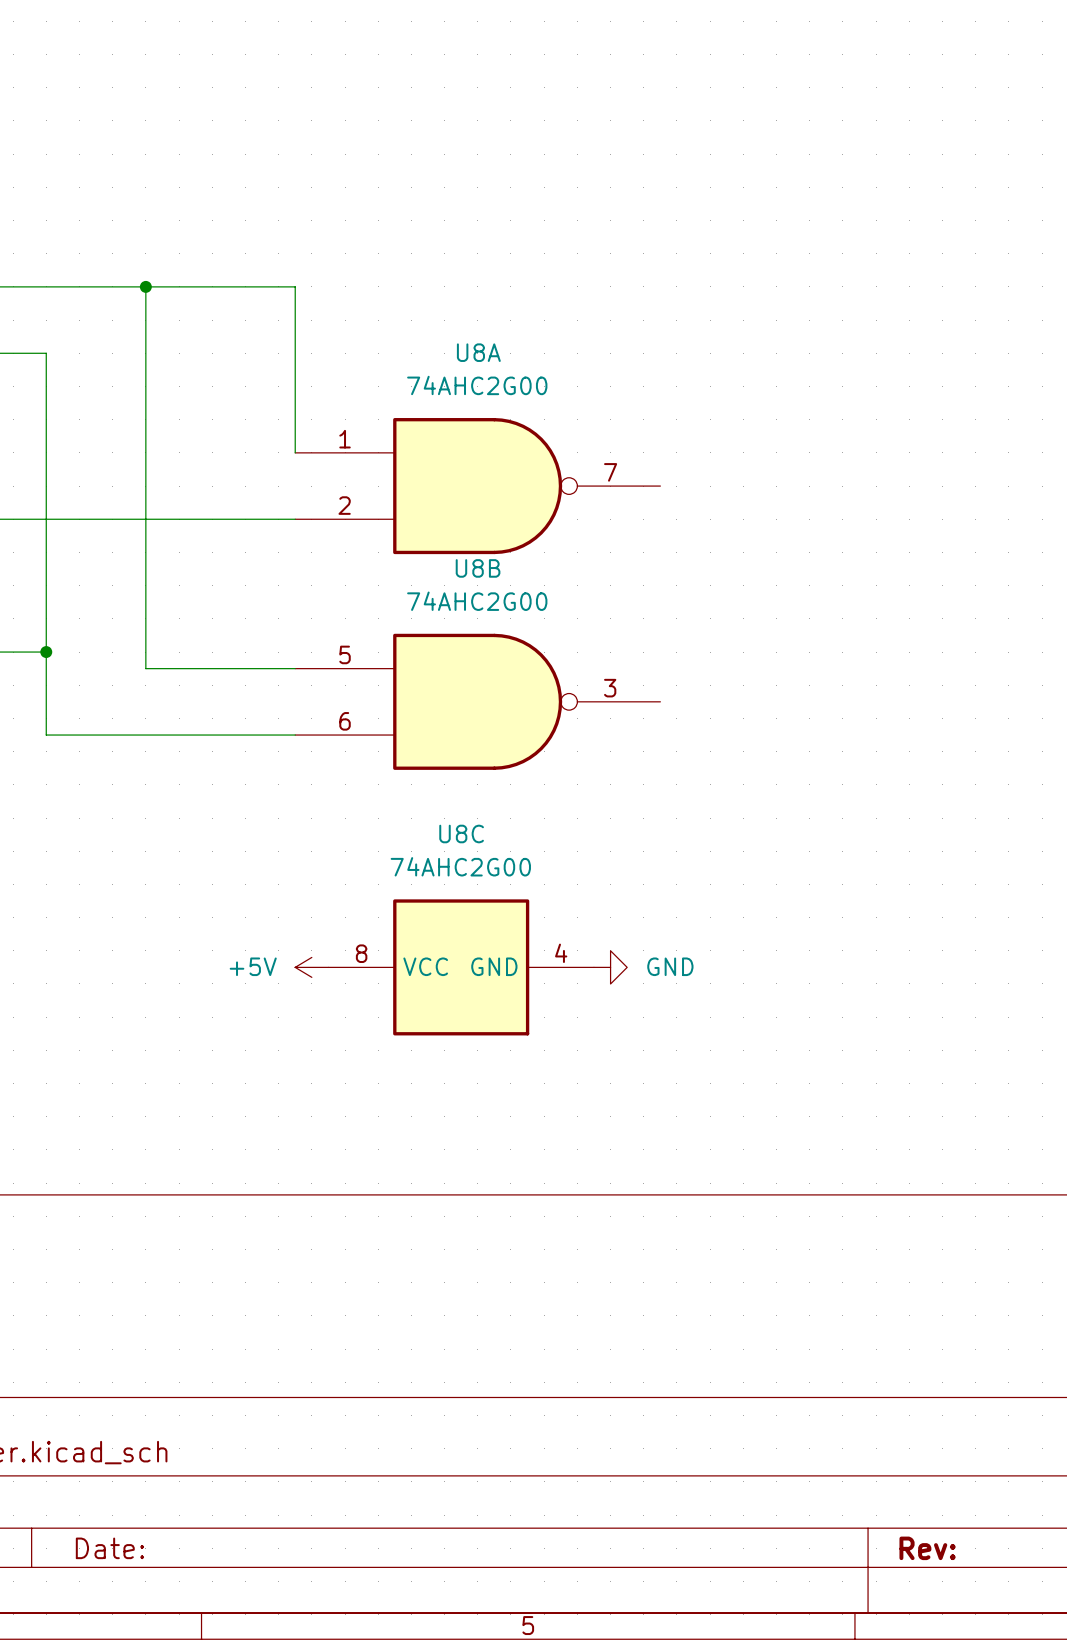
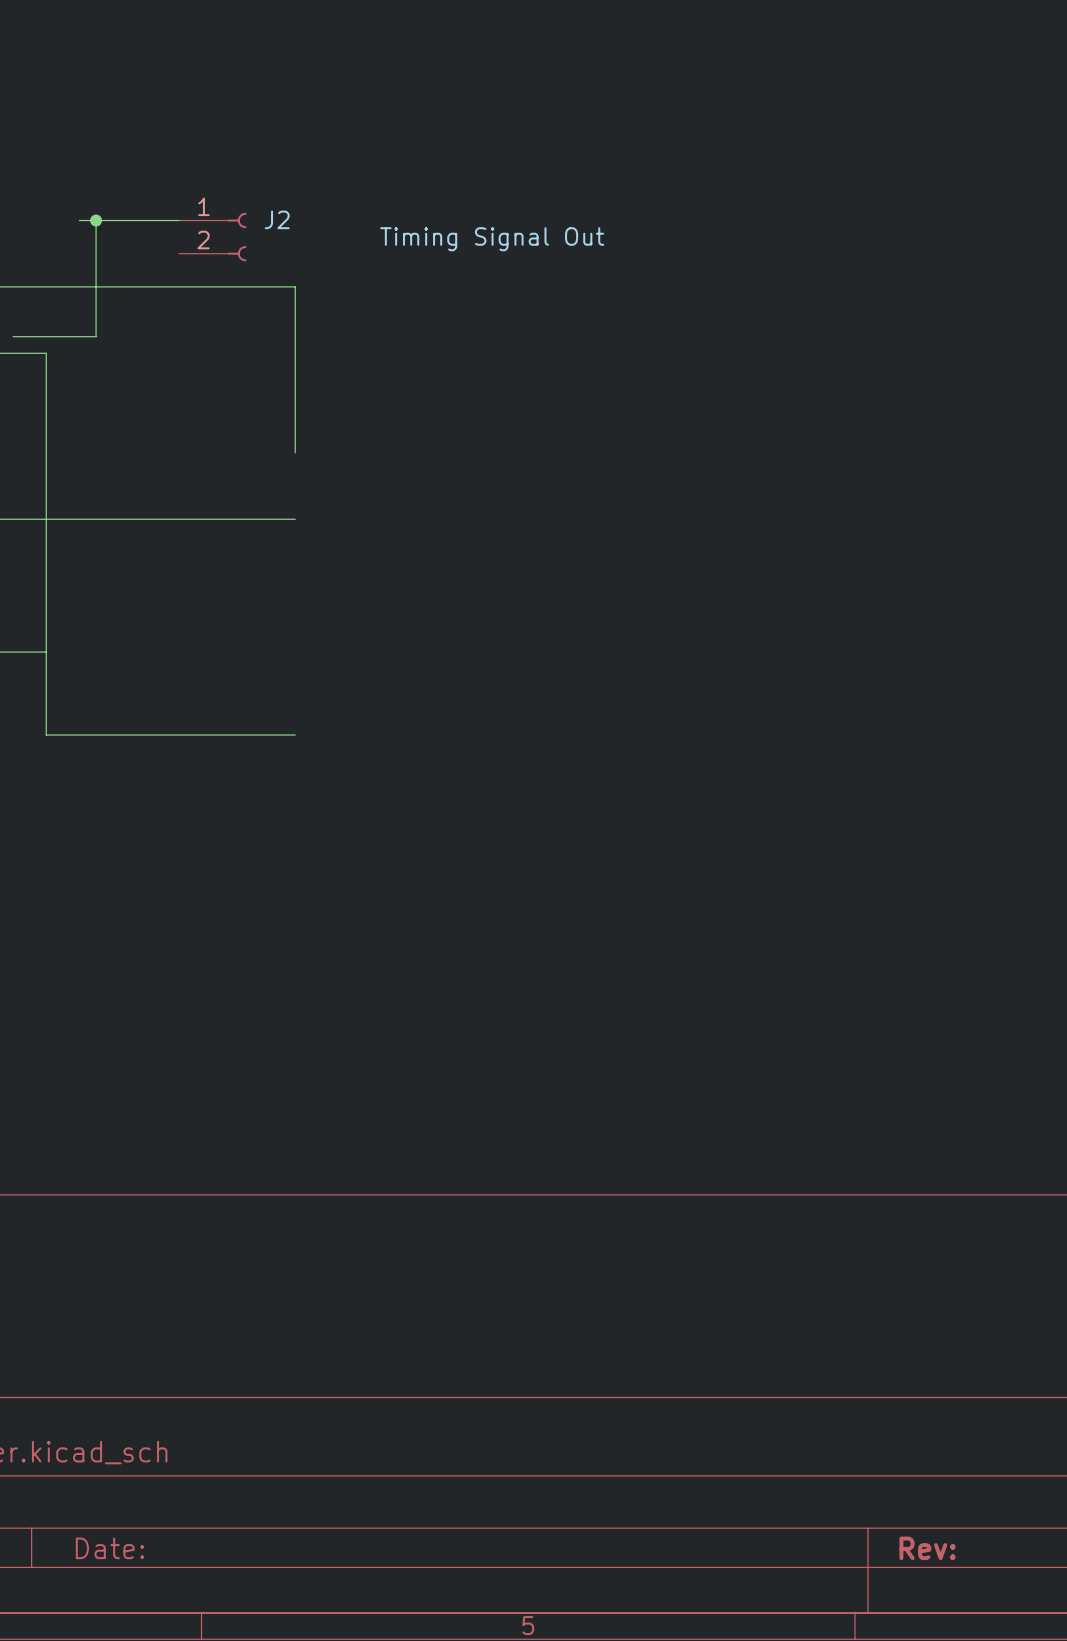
wire: none -> (79, 220) (179, 220)
wire: none -> (96, 220) (96, 336) (13, 336)
junction: none -> (96, 220)
J2: none -> Timing Signal Out (212, 237)
wire: (145, 286) (145, 668) (295, 668) -> none
junction: (145, 286) -> none
U8A: 74AHC2G00 (477, 486) -> none
junction: (46, 652) -> none
U8B: 74AHC2G00 (477, 701) -> none
power symbol: +5V (311, 967) -> none
U8C: 74AHC2G00 (461, 967) -> none
power symbol: GND (610, 967) -> none

